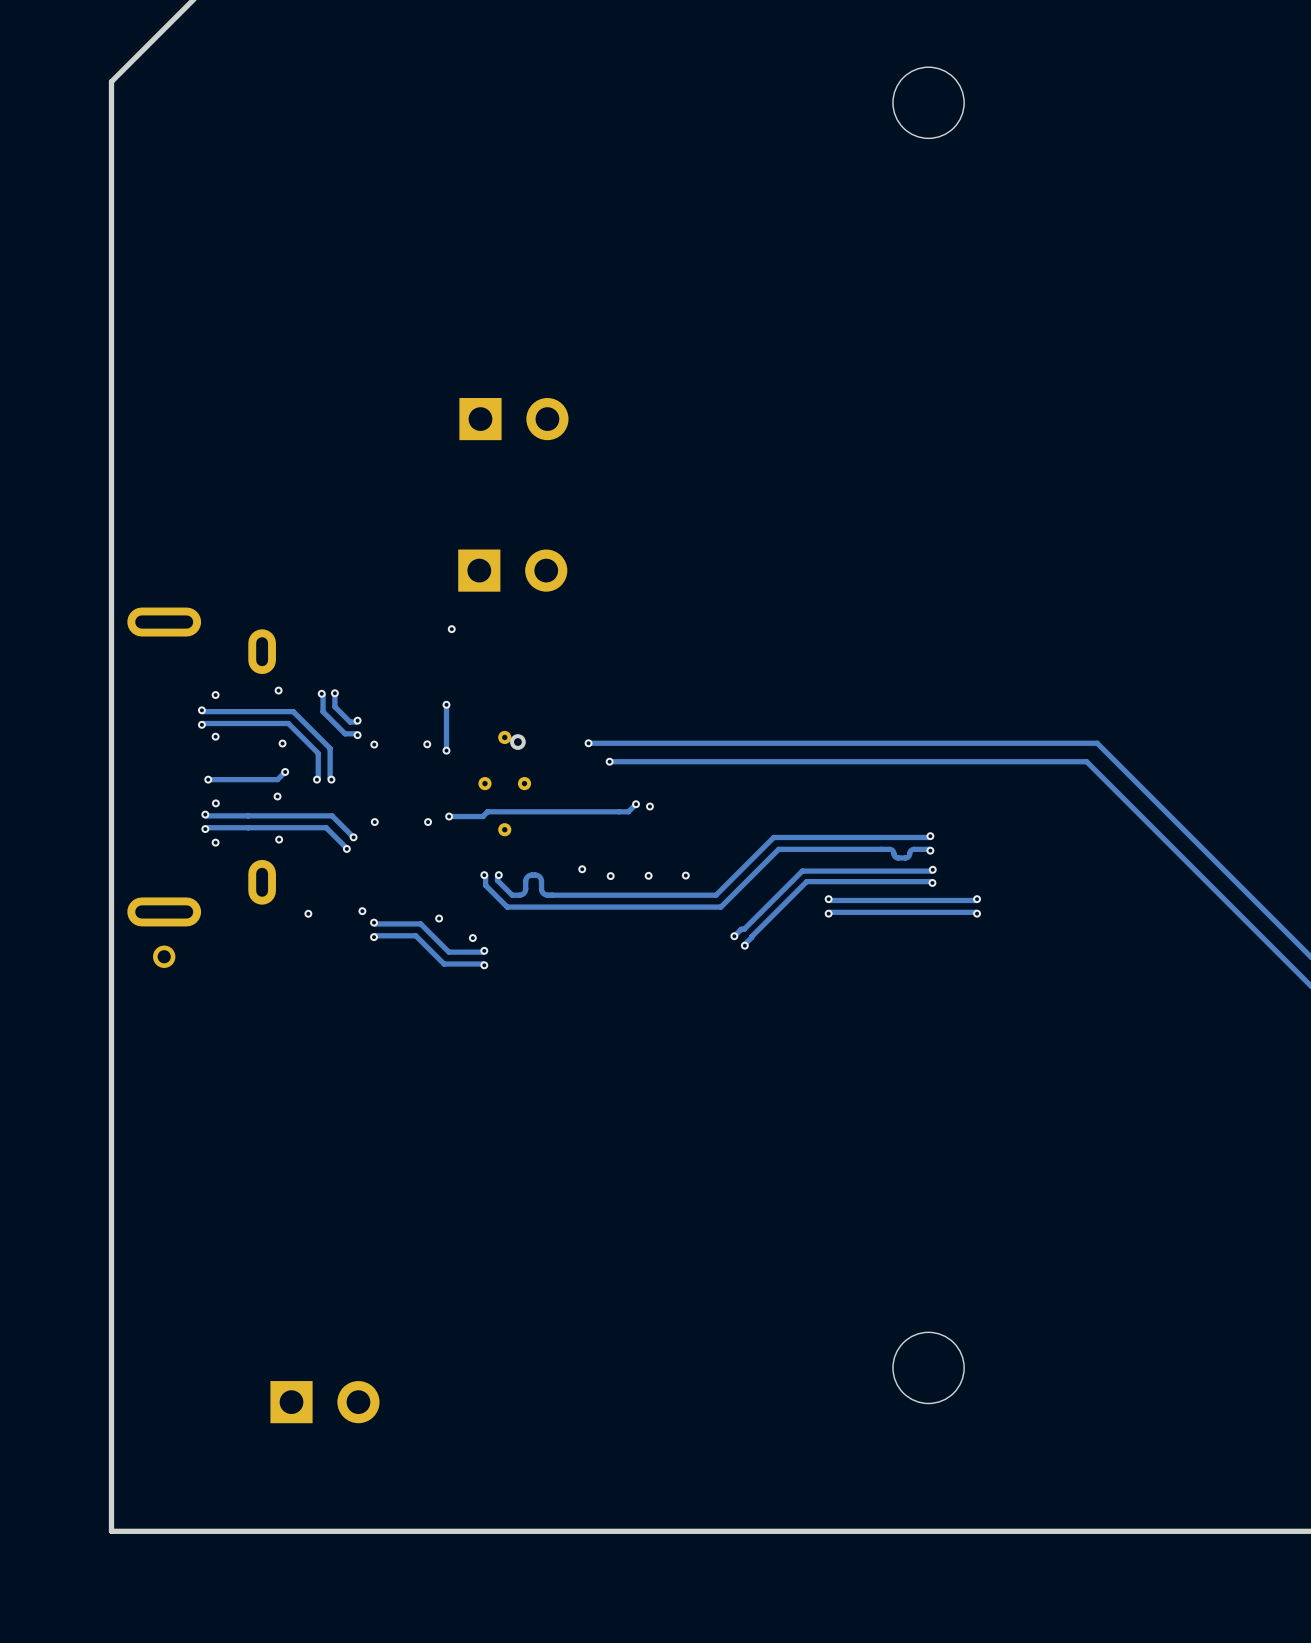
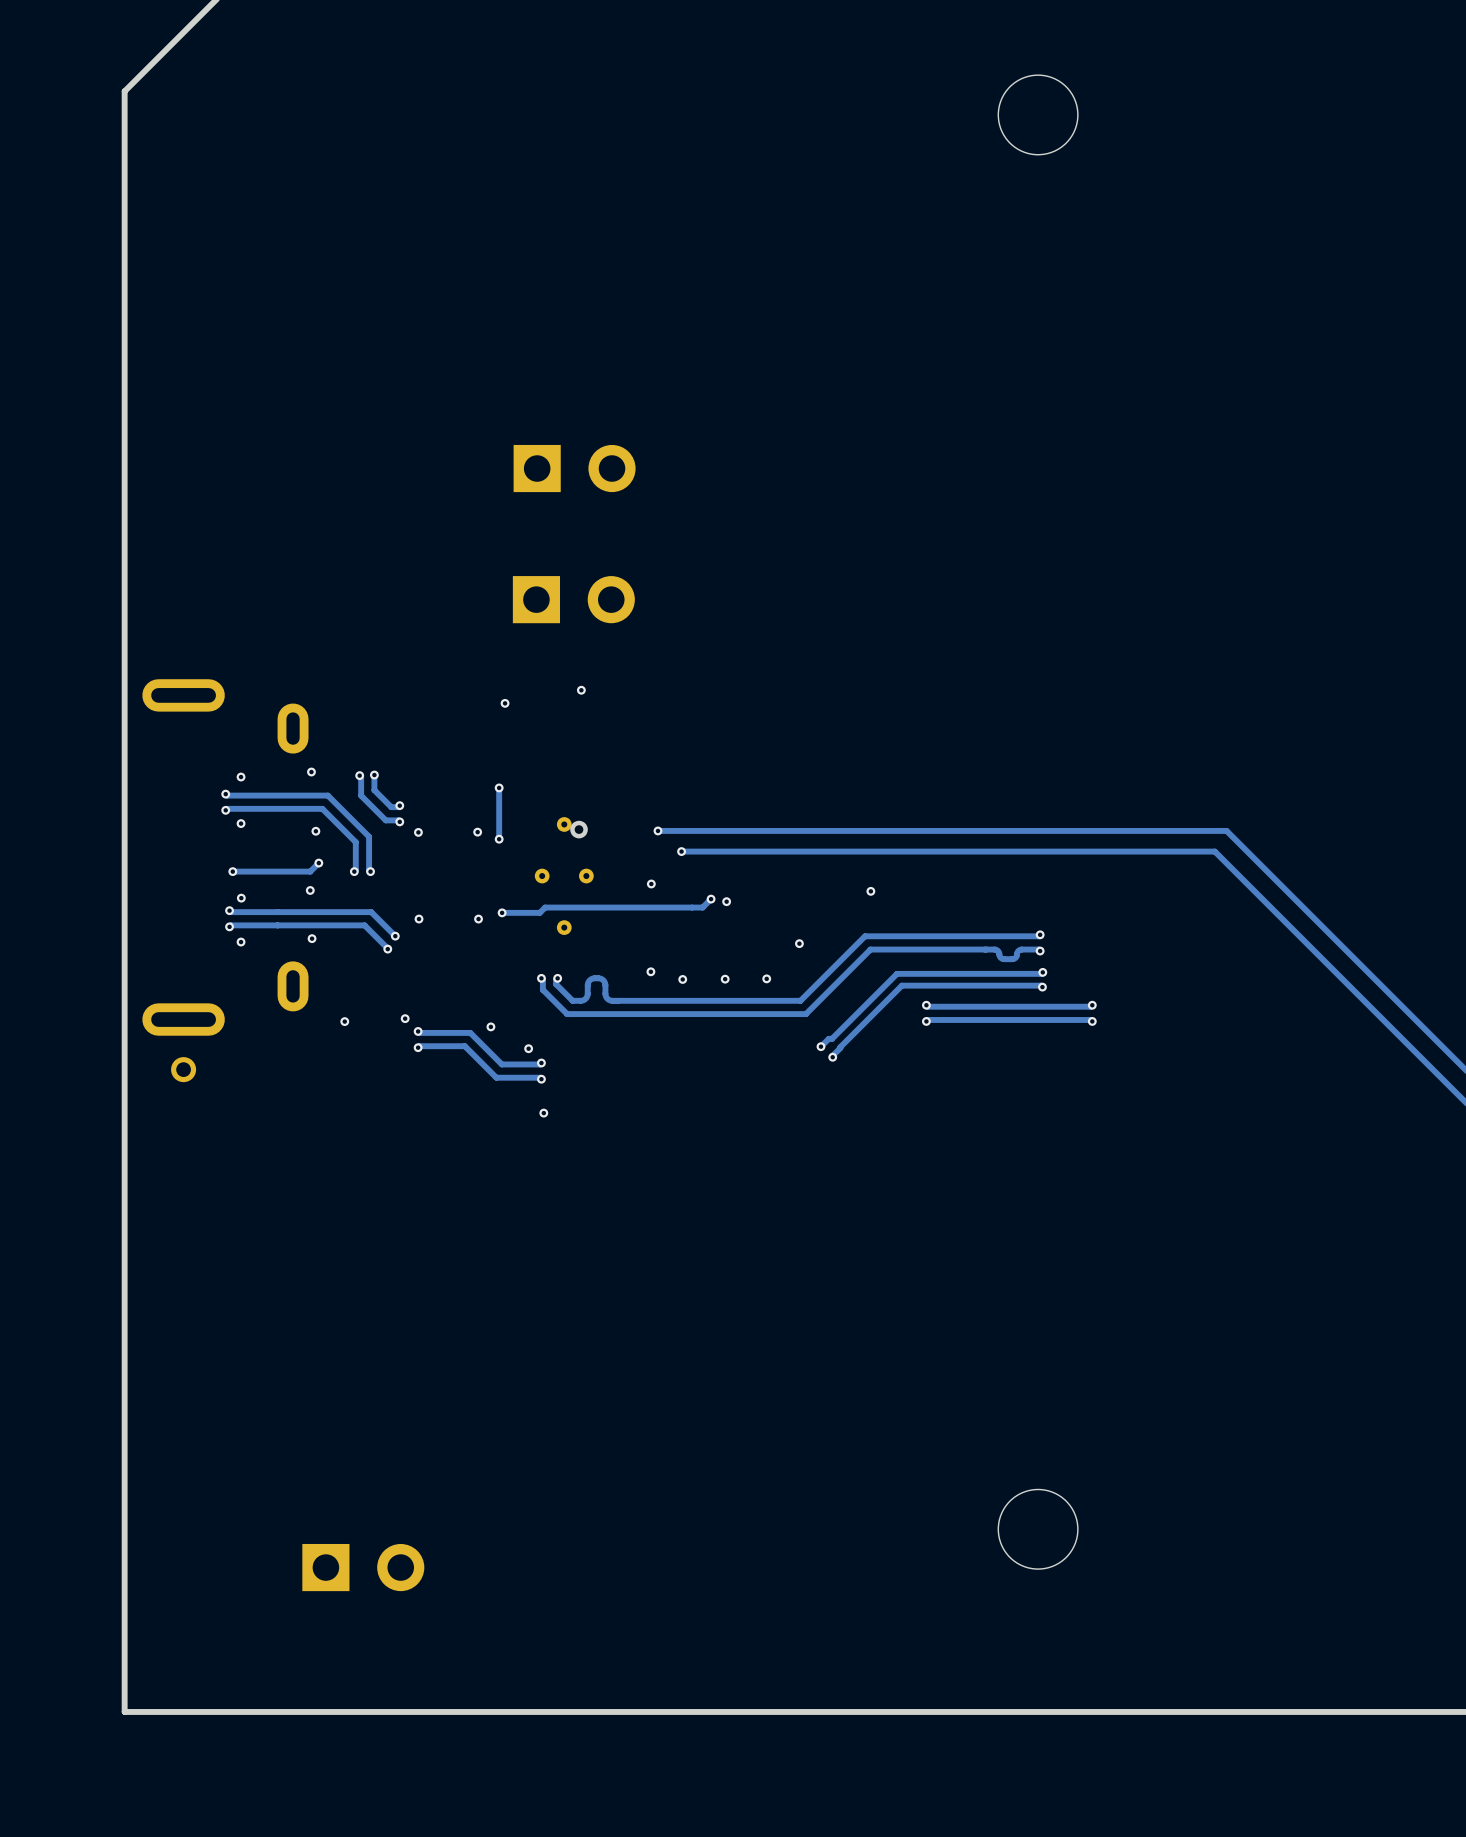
part position: (512, 570) -> (573, 599)
via: none -> (581, 690)
via: none -> (651, 883)
via: none -> (870, 891)
via: none -> (799, 943)
via: none -> (543, 1113)

